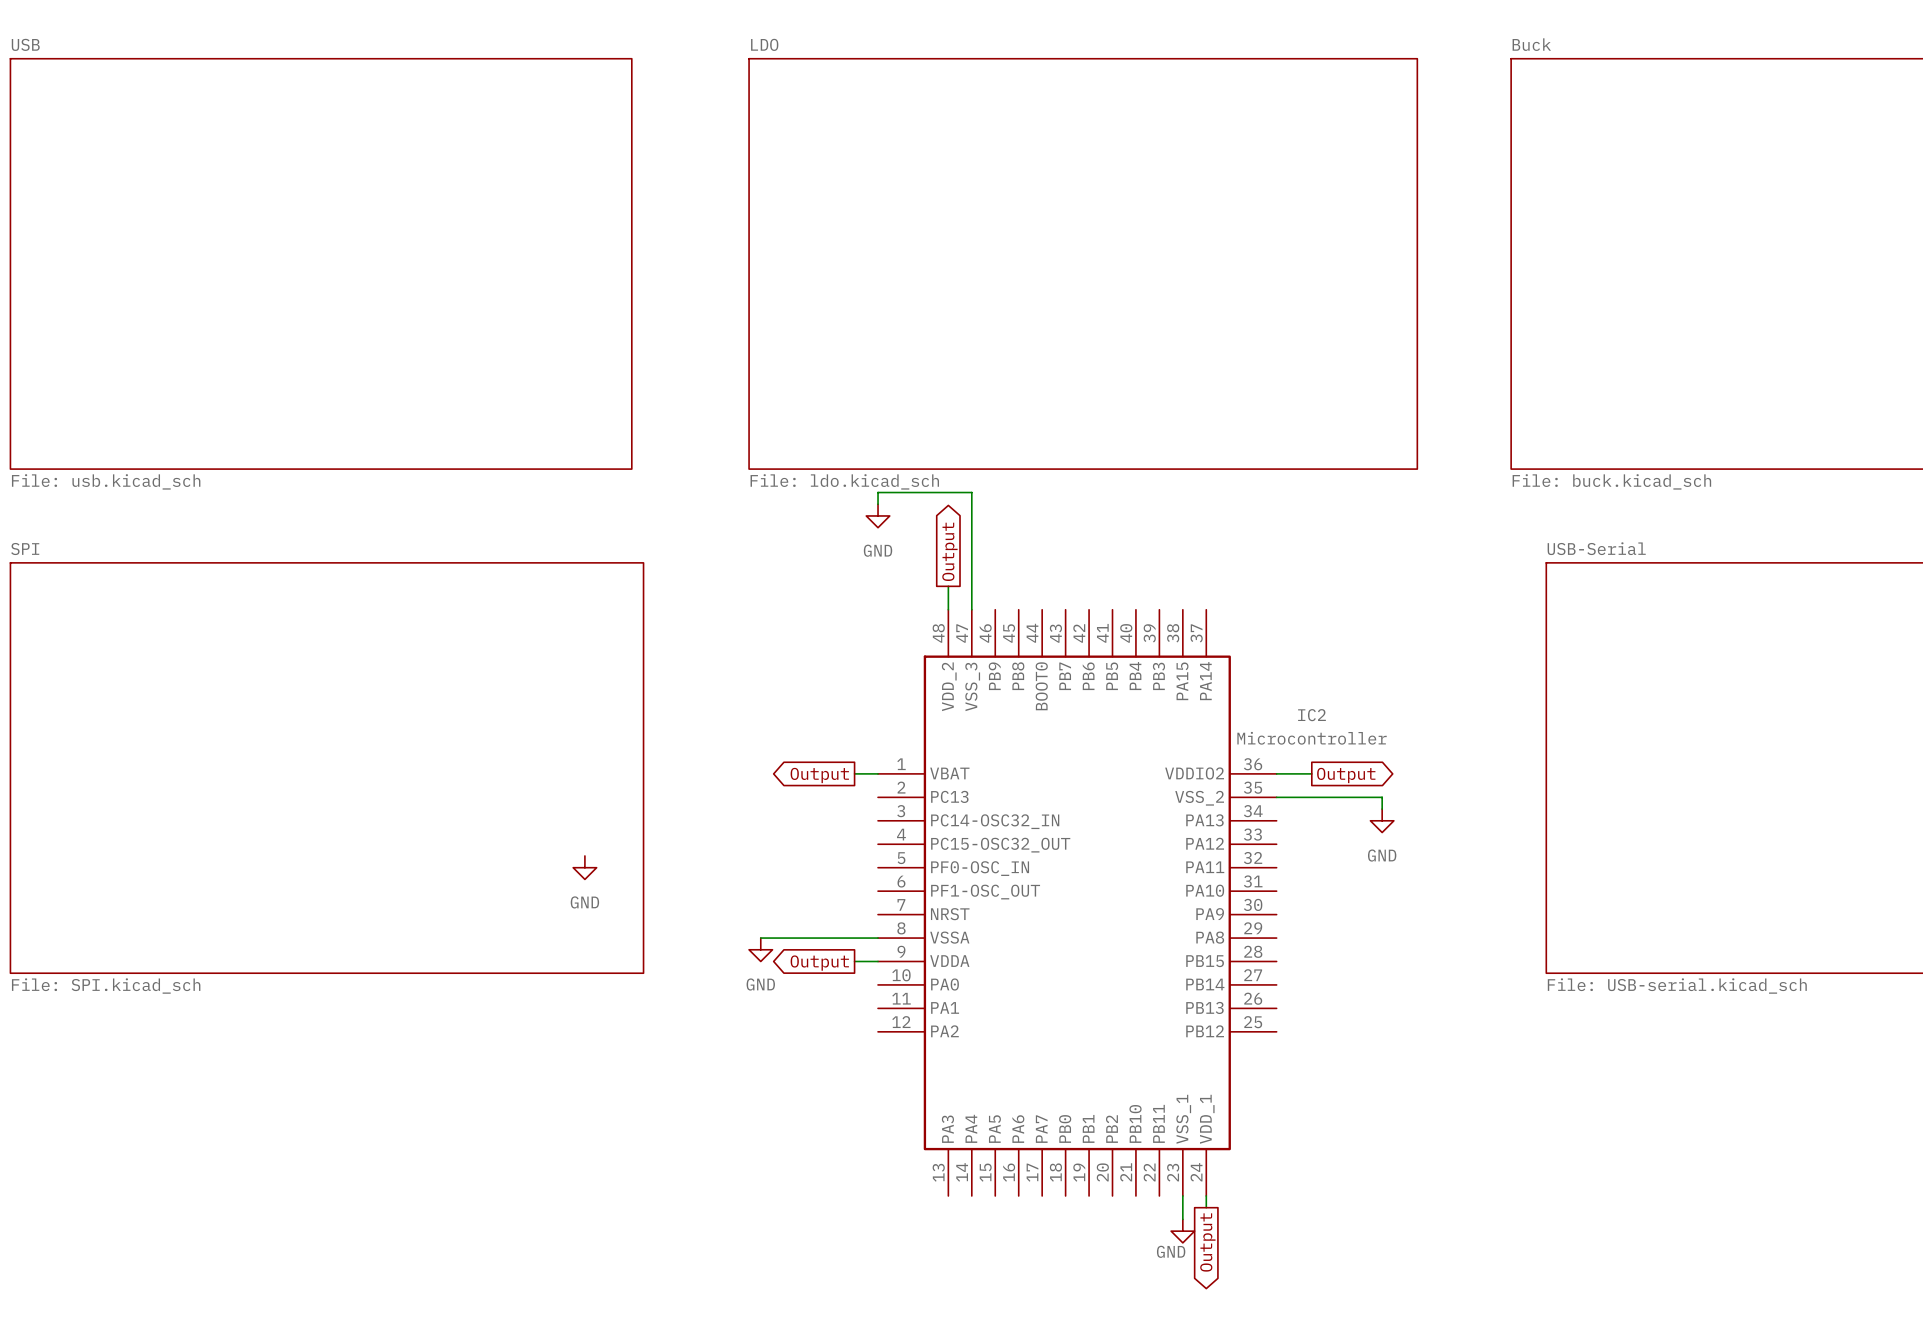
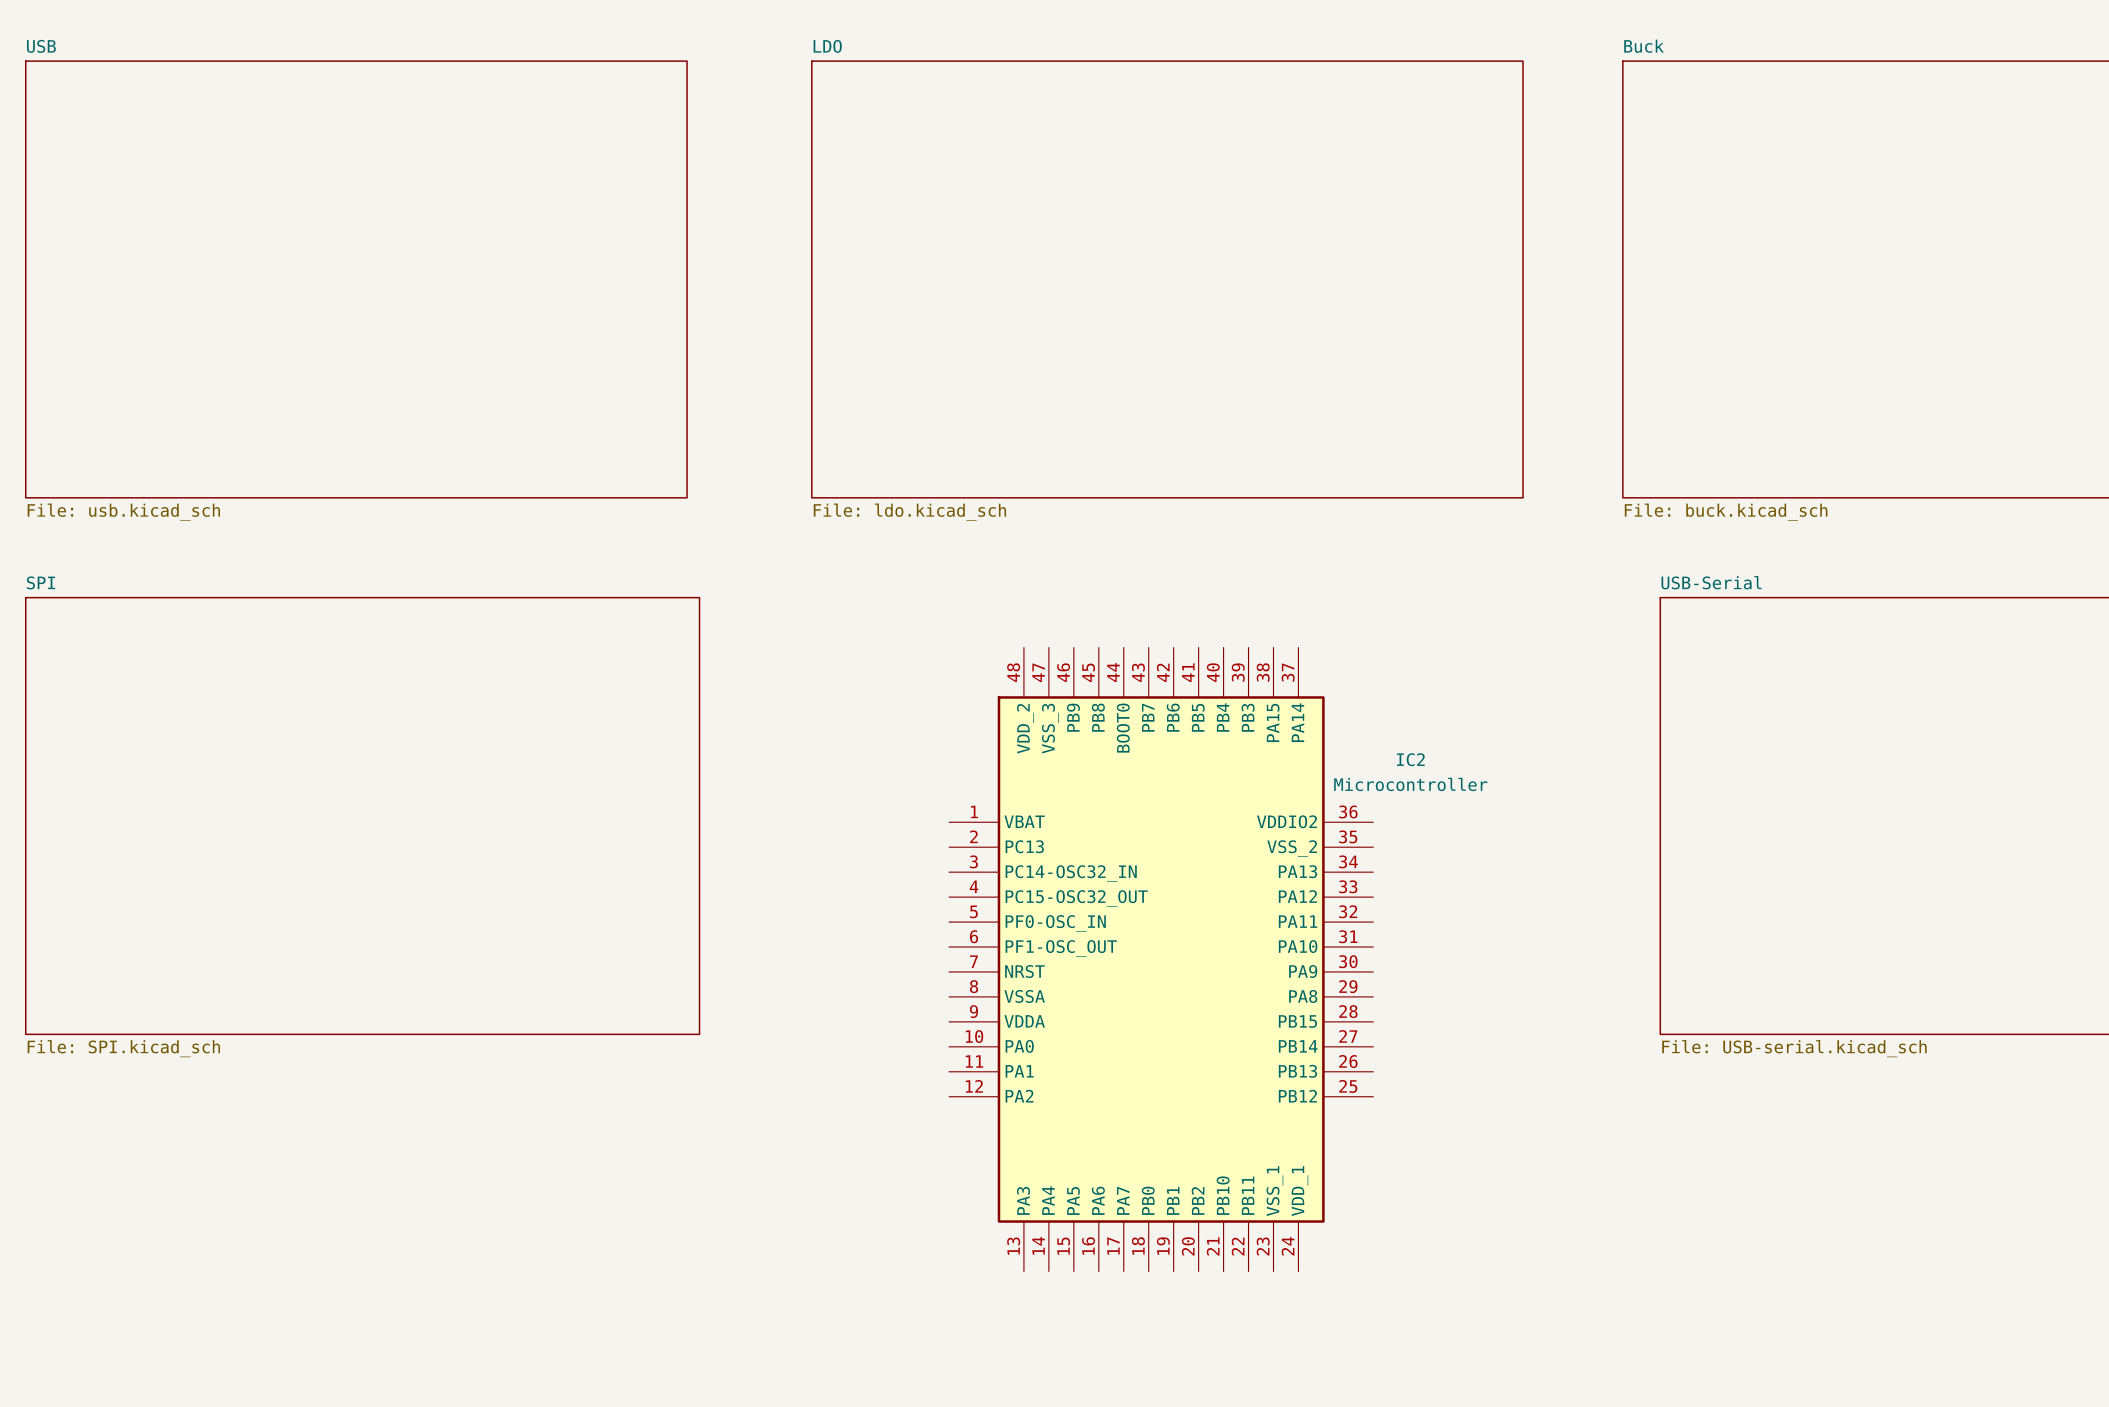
wire: (878, 504) (878, 492) (971, 492) (971, 609) -> none
power symbol: GND (878, 515) -> none
global label: Output (949, 551) -> none
wire: (948, 586) (948, 609) -> none
wire: (854, 773) (878, 773) -> none
wire: (1276, 773) (1311, 773) -> none
global label: Output (819, 775) -> none
global label: Output (1346, 775) -> none
wire: (1276, 797) (1382, 797) (1382, 809) -> none
power symbol: GND (1382, 820) -> none
power symbol: GND (584, 867) -> none
wire: (760, 938) (878, 938) -> none
power symbol: GND (760, 949) -> none
wire: (854, 961) (878, 961) -> none
global label: Output (819, 963) -> none
wire: (1182, 1195) (1182, 1219) -> none
wire: (1206, 1195) (1206, 1207) -> none
power symbol: GND (1182, 1231) -> none
global label: Output (1207, 1242) -> none

